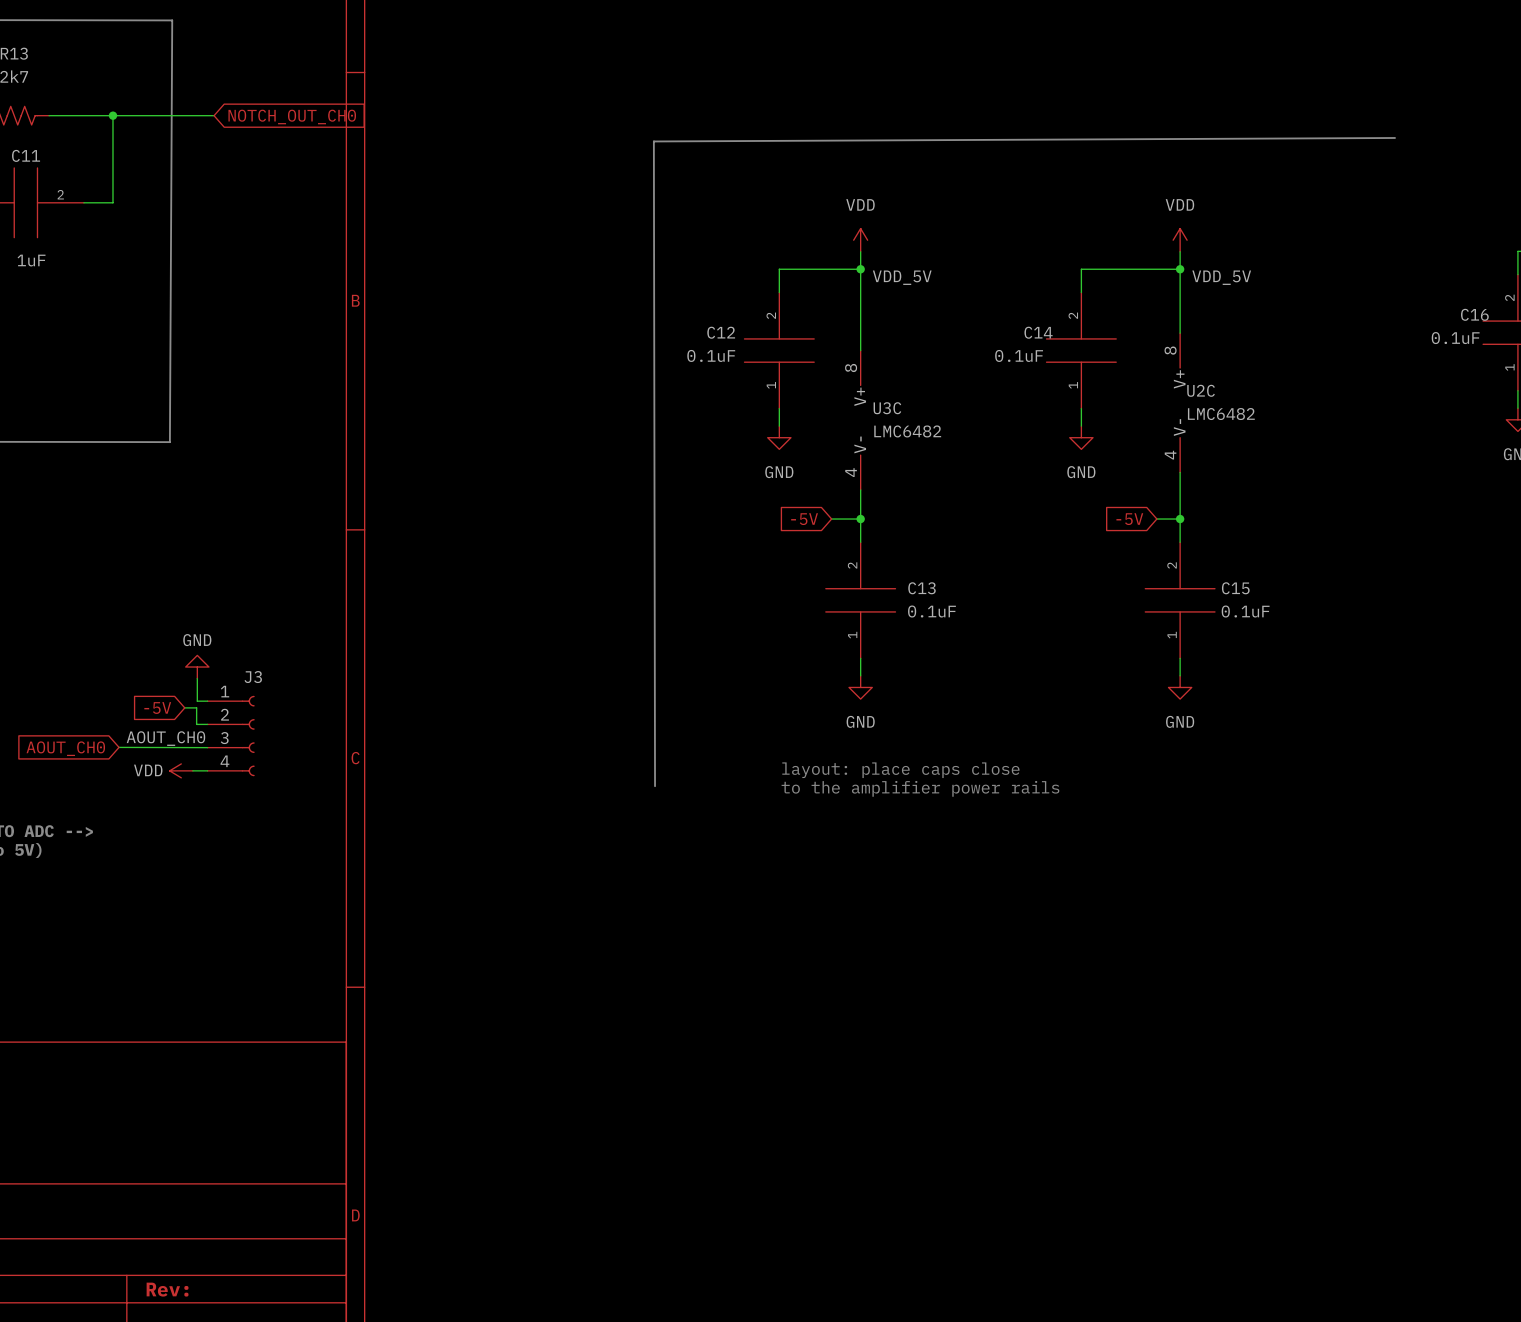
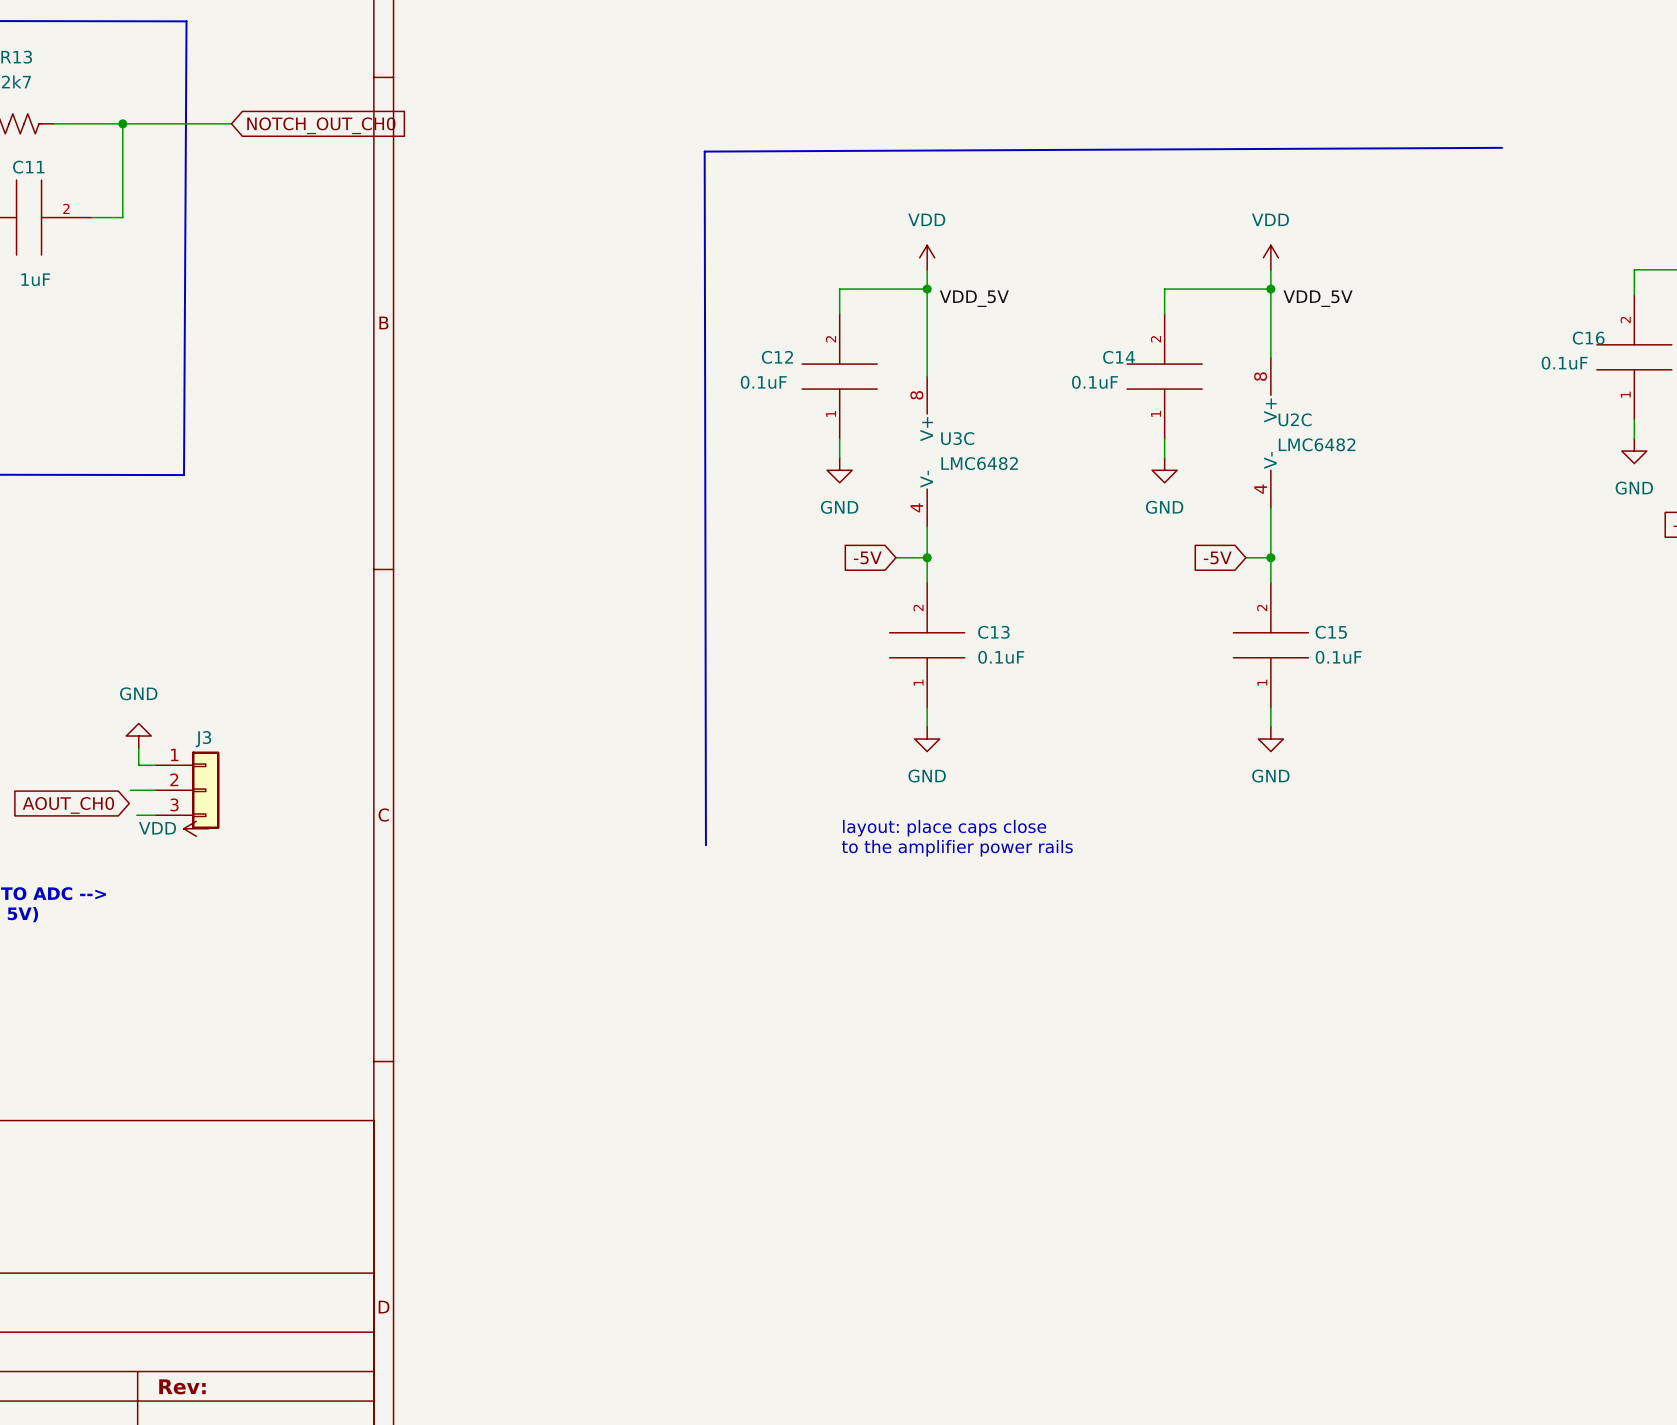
power symbol text position: GND (197, 640) -> GND (138, 693)
power symbol position: GND (197, 667) -> GND (138, 736)
wire: (197, 678) (197, 701) (207, 701) -> none
J3 symbol: [207, 695, 255, 777] -> [155, 751, 220, 830]
wire: none -> (138, 748) (138, 765) (155, 765)
global label: -5V (157, 708) -> none
wire: none -> (130, 790) (155, 790)
label: AOUT_CH0 (165, 738) -> none
wire: (119, 747) (207, 747) -> none
wire: none -> (136, 815) (155, 815)
wire: (192, 770) (207, 770) -> none

